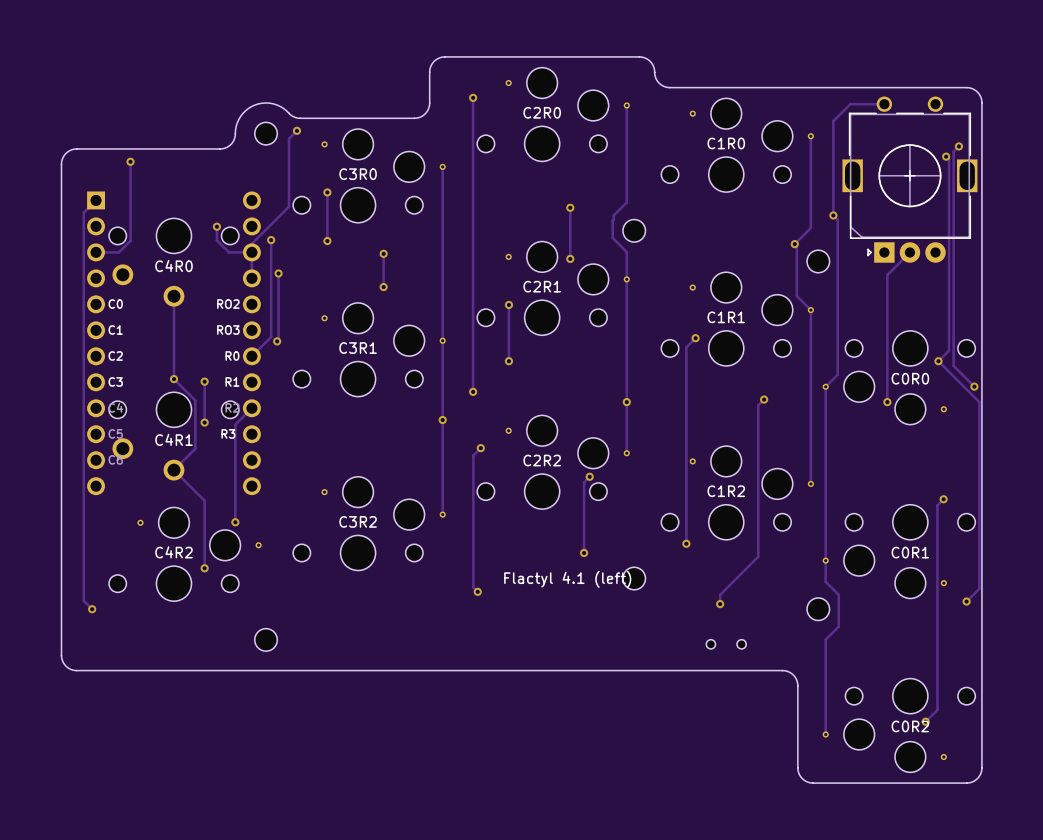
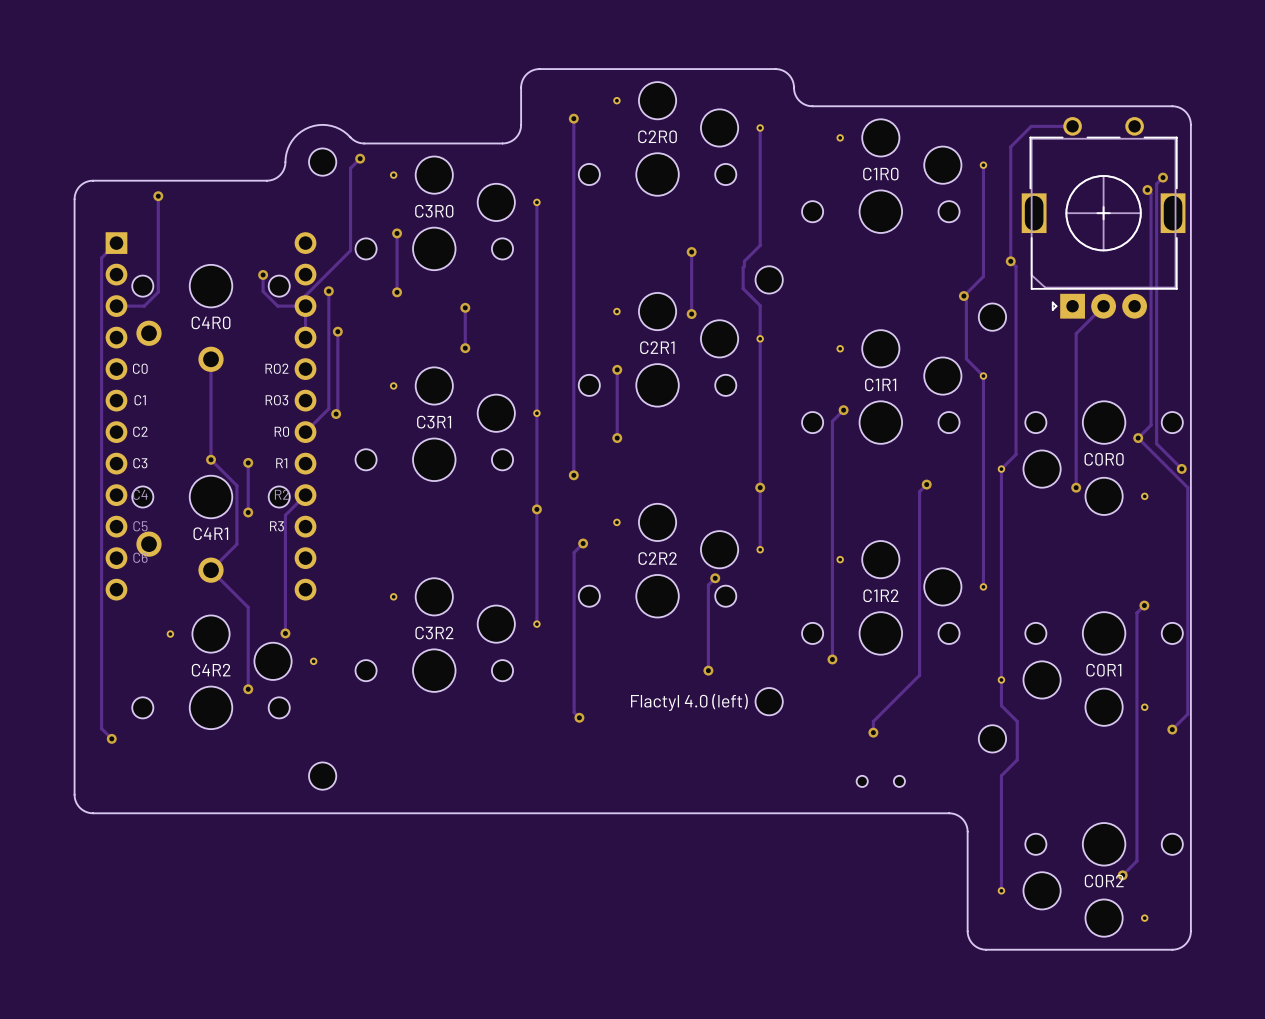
drawing shape: [504, 570, 632, 588] -> [631, 693, 748, 711]

